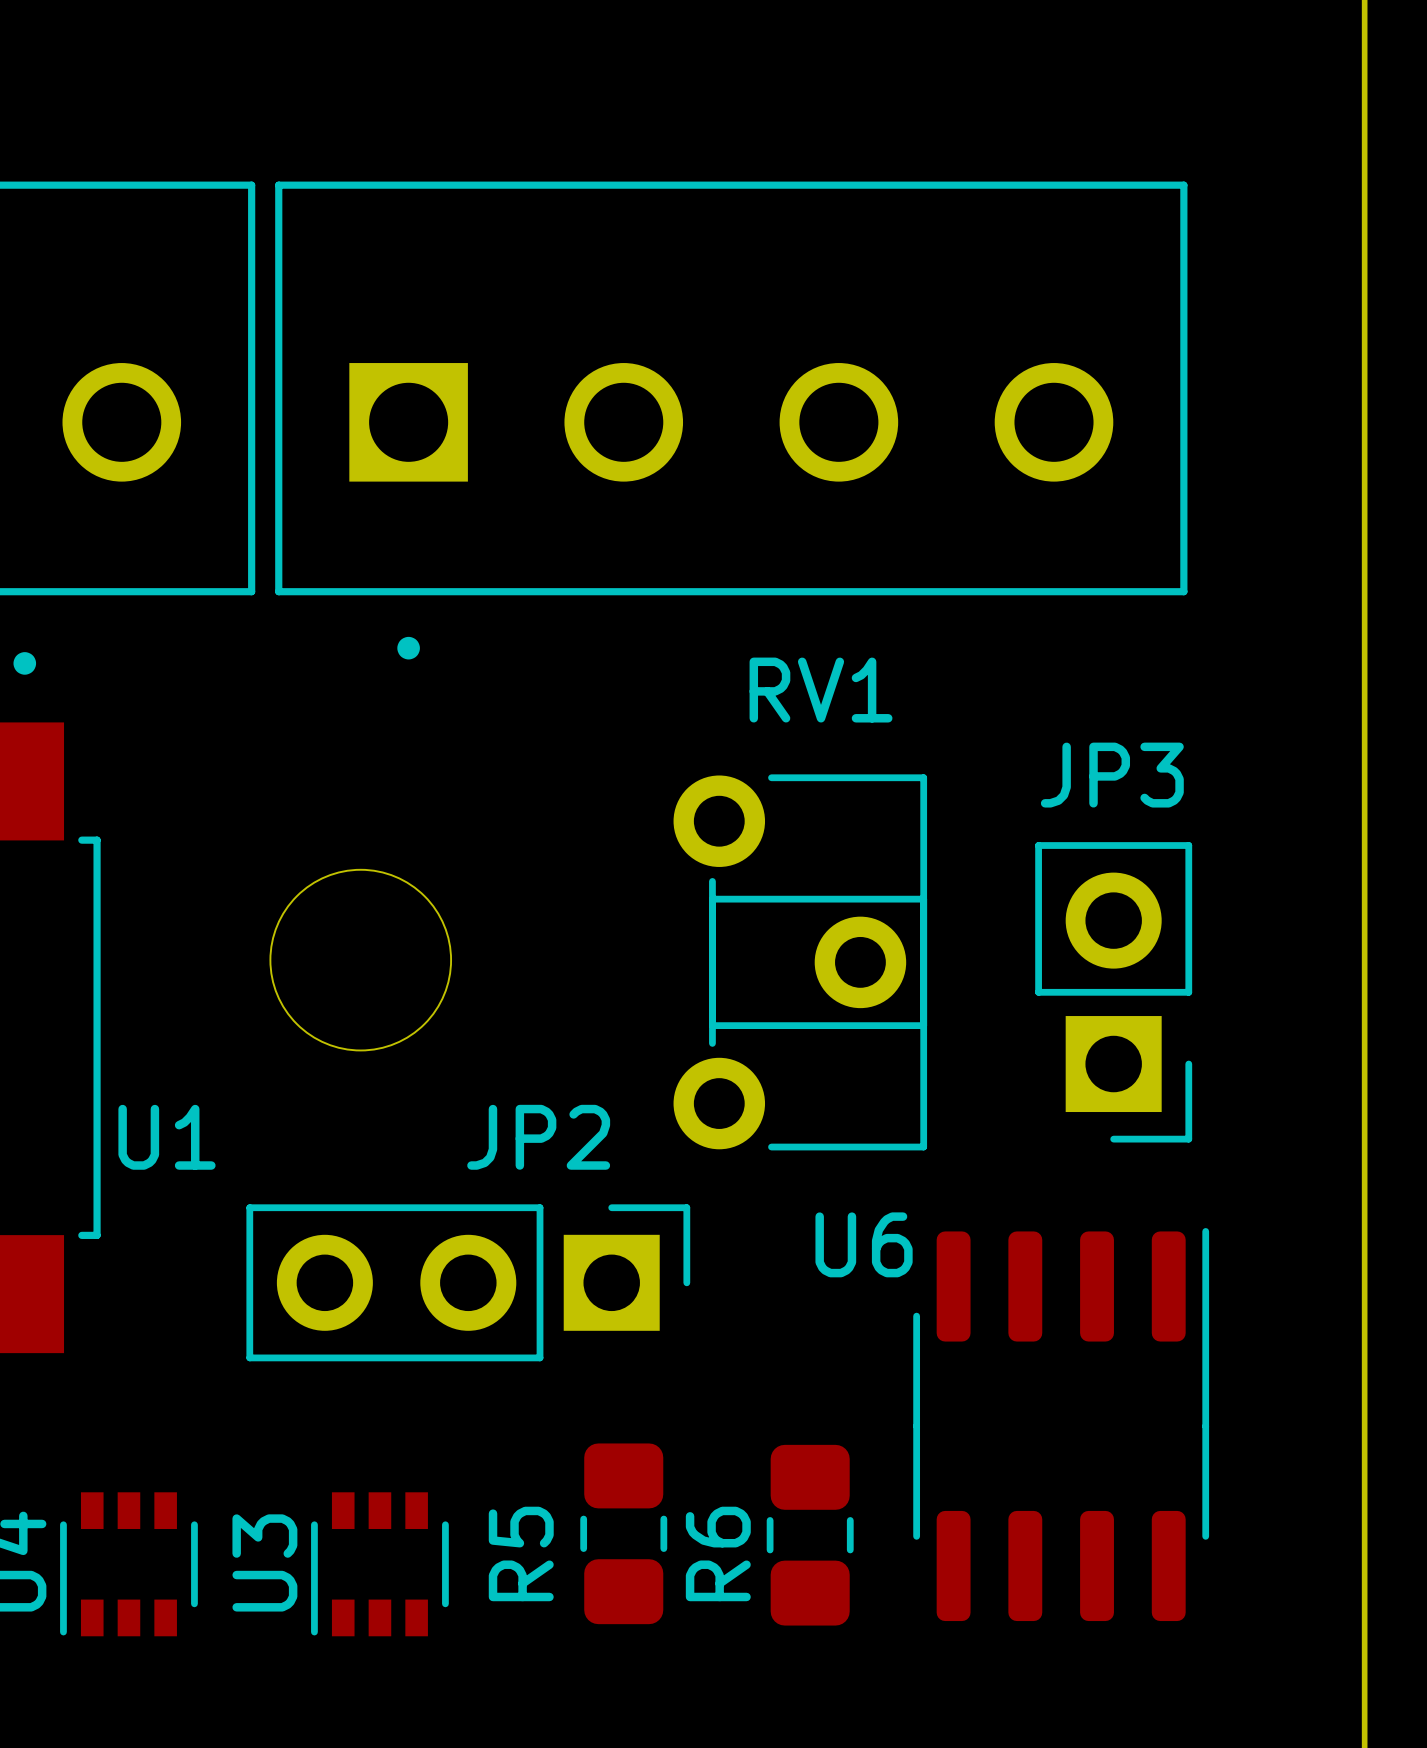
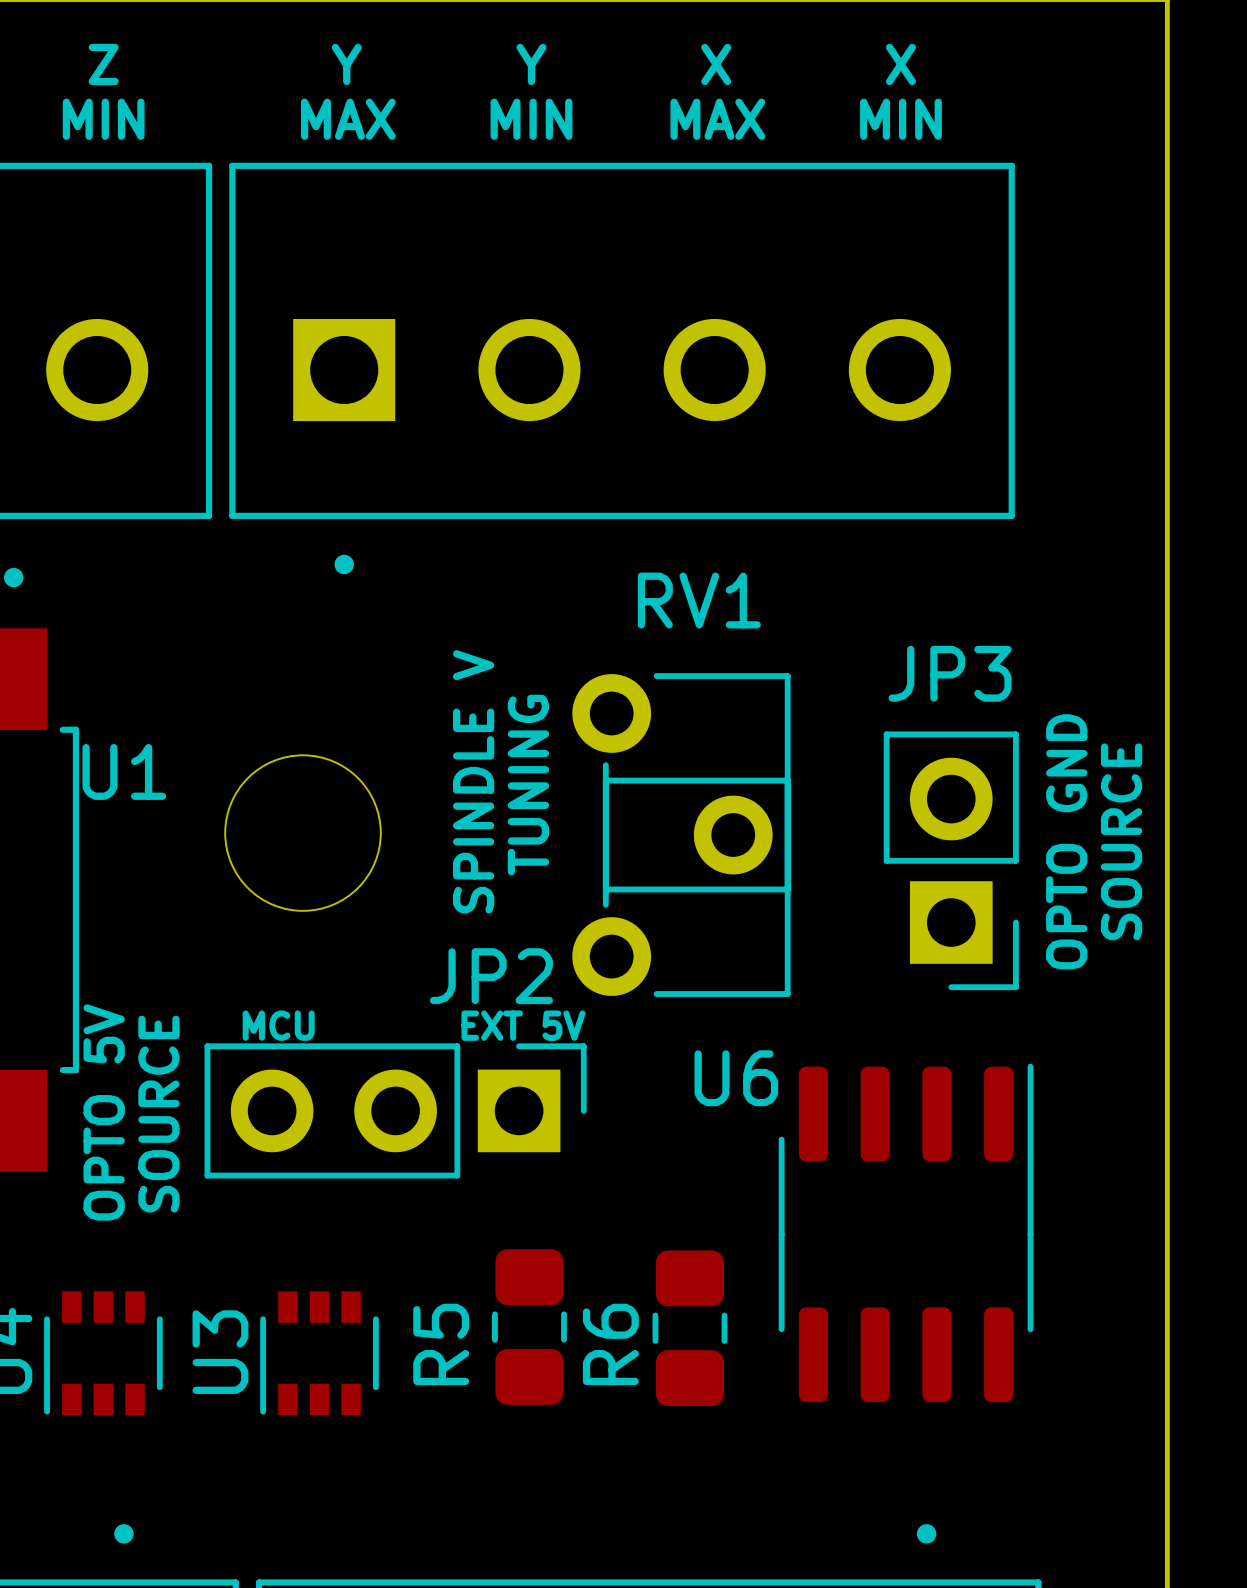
text: none -> Z (103, 64)
text: none -> Y (346, 64)
text: none -> Y (531, 64)
text: none -> X (716, 64)
text: none -> X (900, 64)
text: none -> MIN (103, 119)
text: none -> MAX (348, 119)
text: none -> MIN (531, 119)
text: none -> MAX (717, 119)
text: none -> MIN (900, 119)
text: none -> SPINDLE V (473, 781)
text: none -> TUNING (528, 785)
text: none -> OPTO GND (1066, 841)
text: none -> SOURCE (1121, 841)
U1 name position: U1 (167, 1137) -> U1 (124, 771)
JP2 name position: JP2 (538, 1137) -> JP2 (491, 976)
text: none -> MCU (278, 1025)
text: none -> EXT 5V (523, 1025)
text: none -> OPTO 5V (104, 1112)
text: none -> SOURCE (158, 1114)

